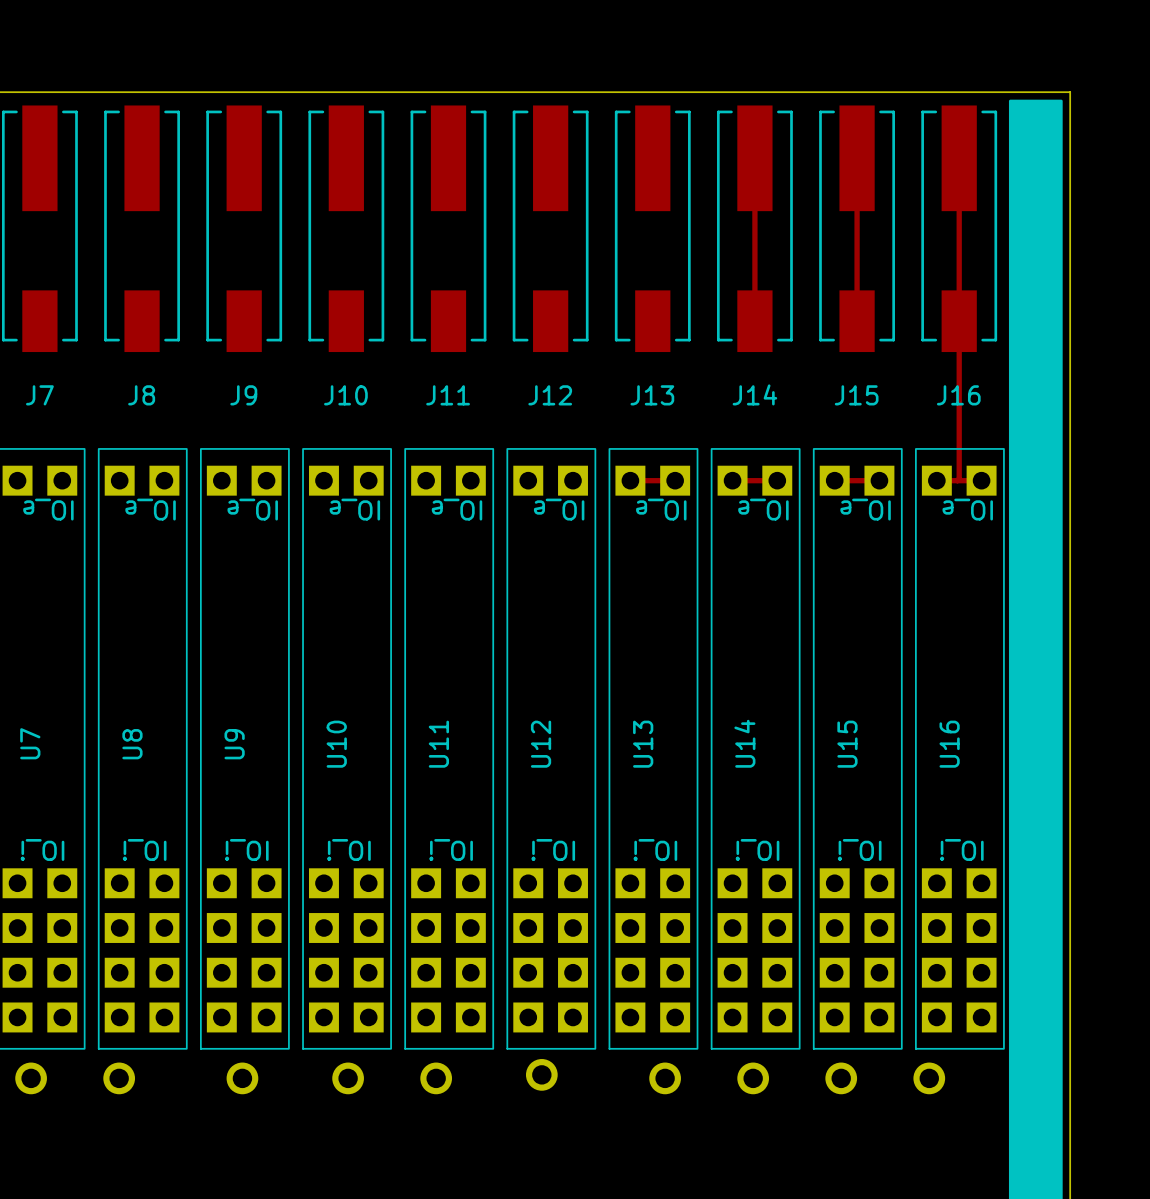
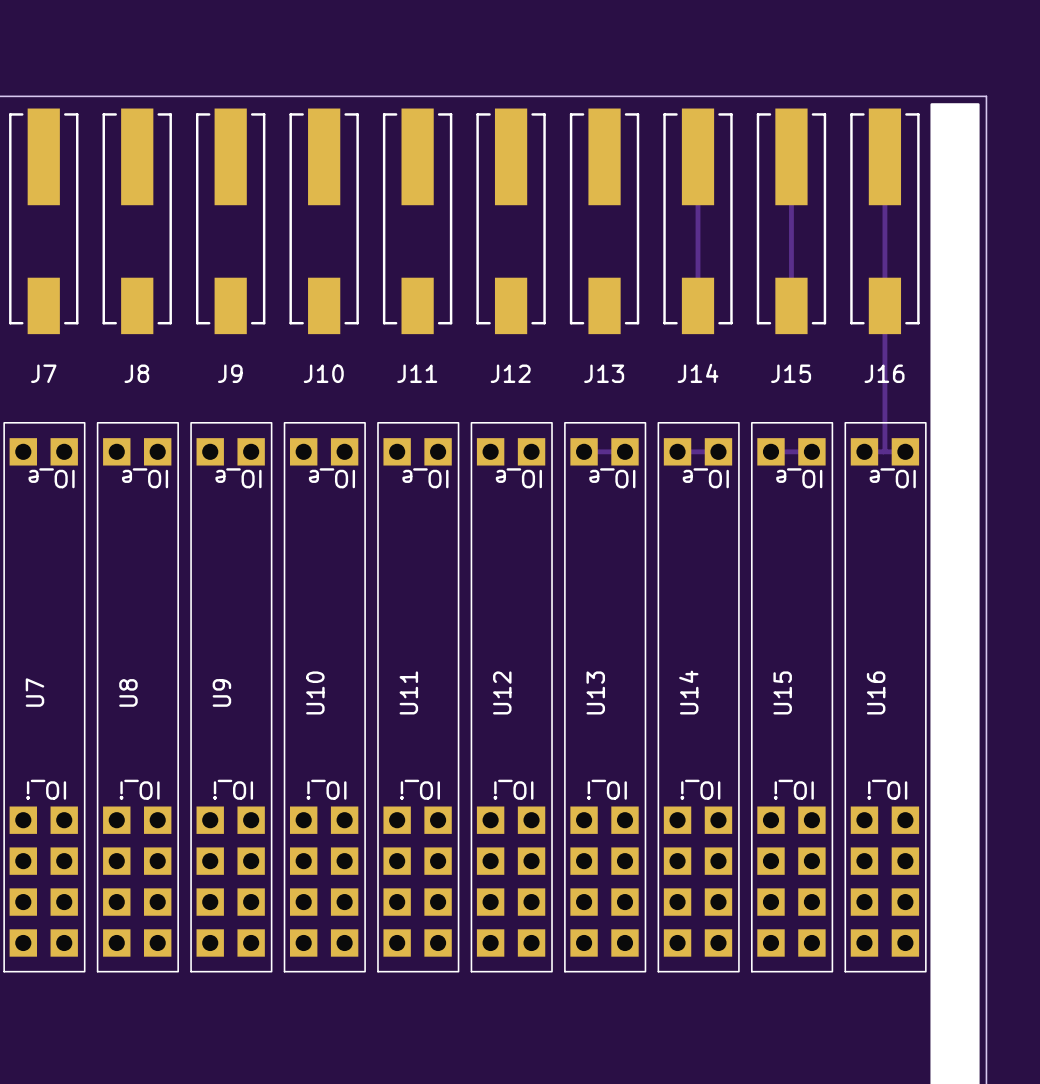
part: (541, 1074) -> none
part: (31, 1078) -> none
part: (119, 1078) -> none
part: (242, 1078) -> none
part: (348, 1078) -> none
part: (436, 1078) -> none
part: (665, 1078) -> none
part: (753, 1078) -> none
part: (841, 1078) -> none
part: (929, 1078) -> none

